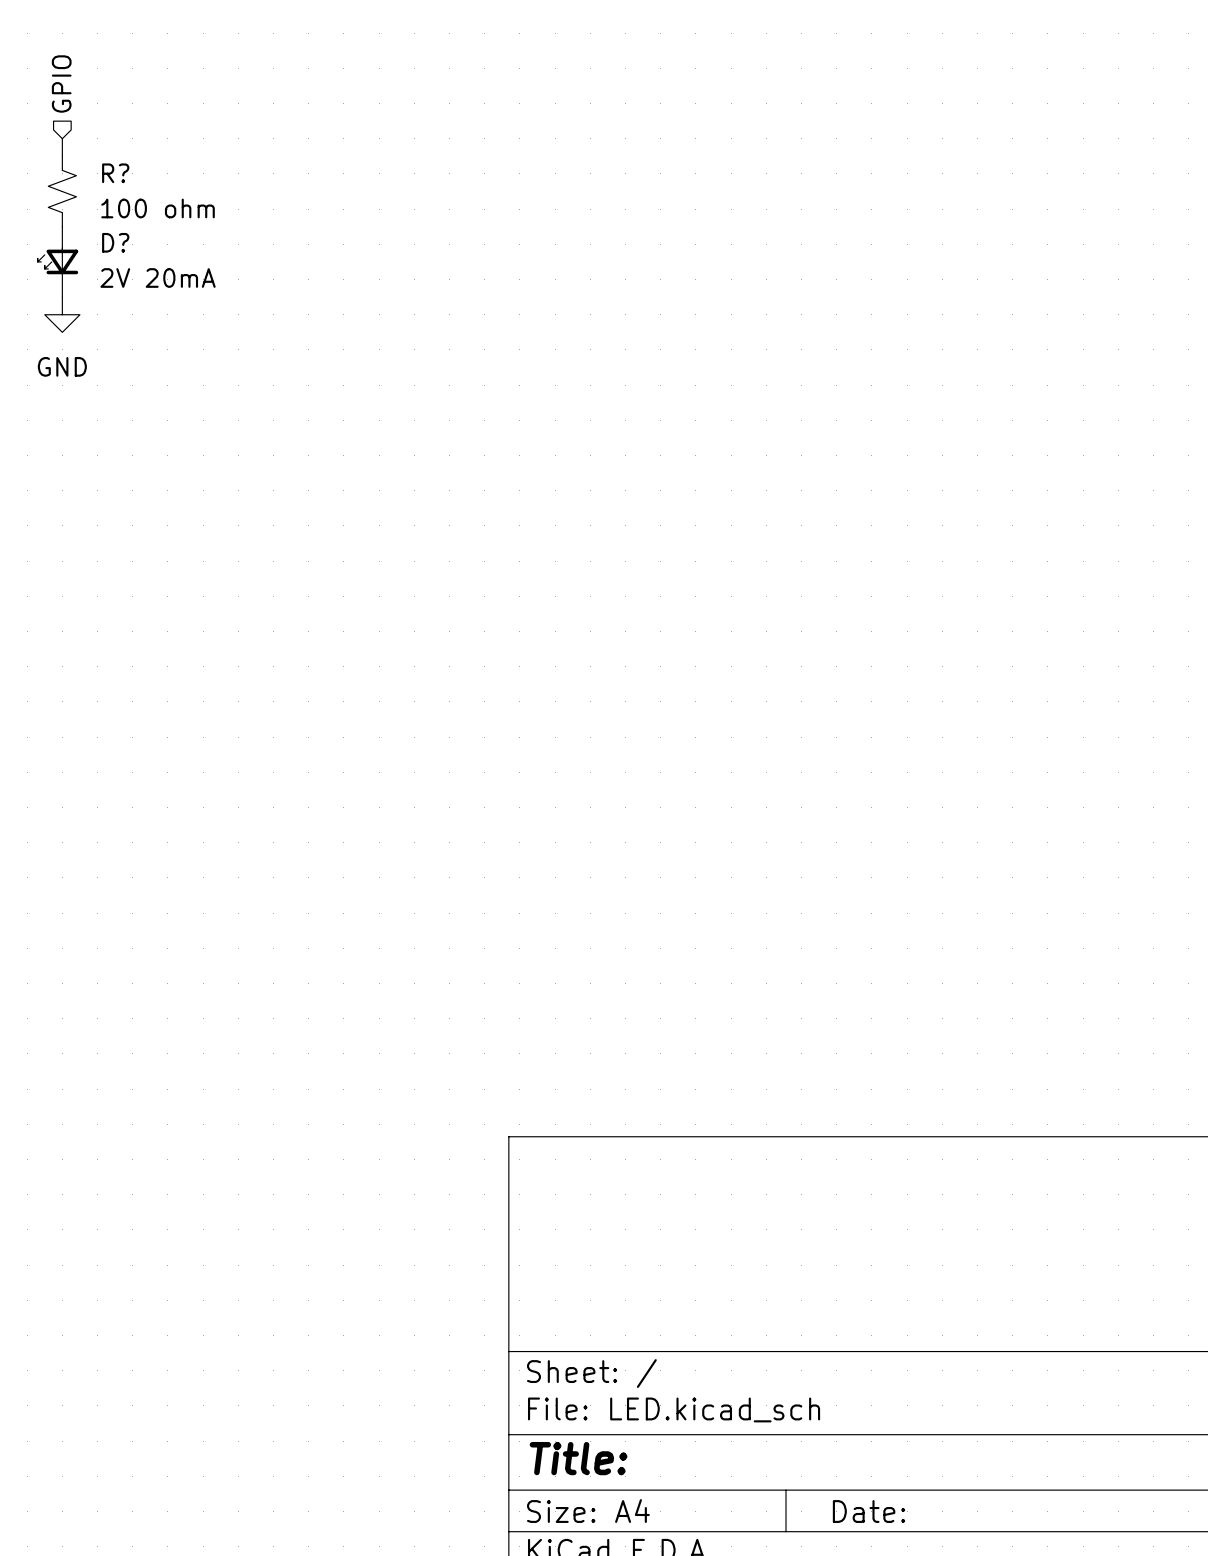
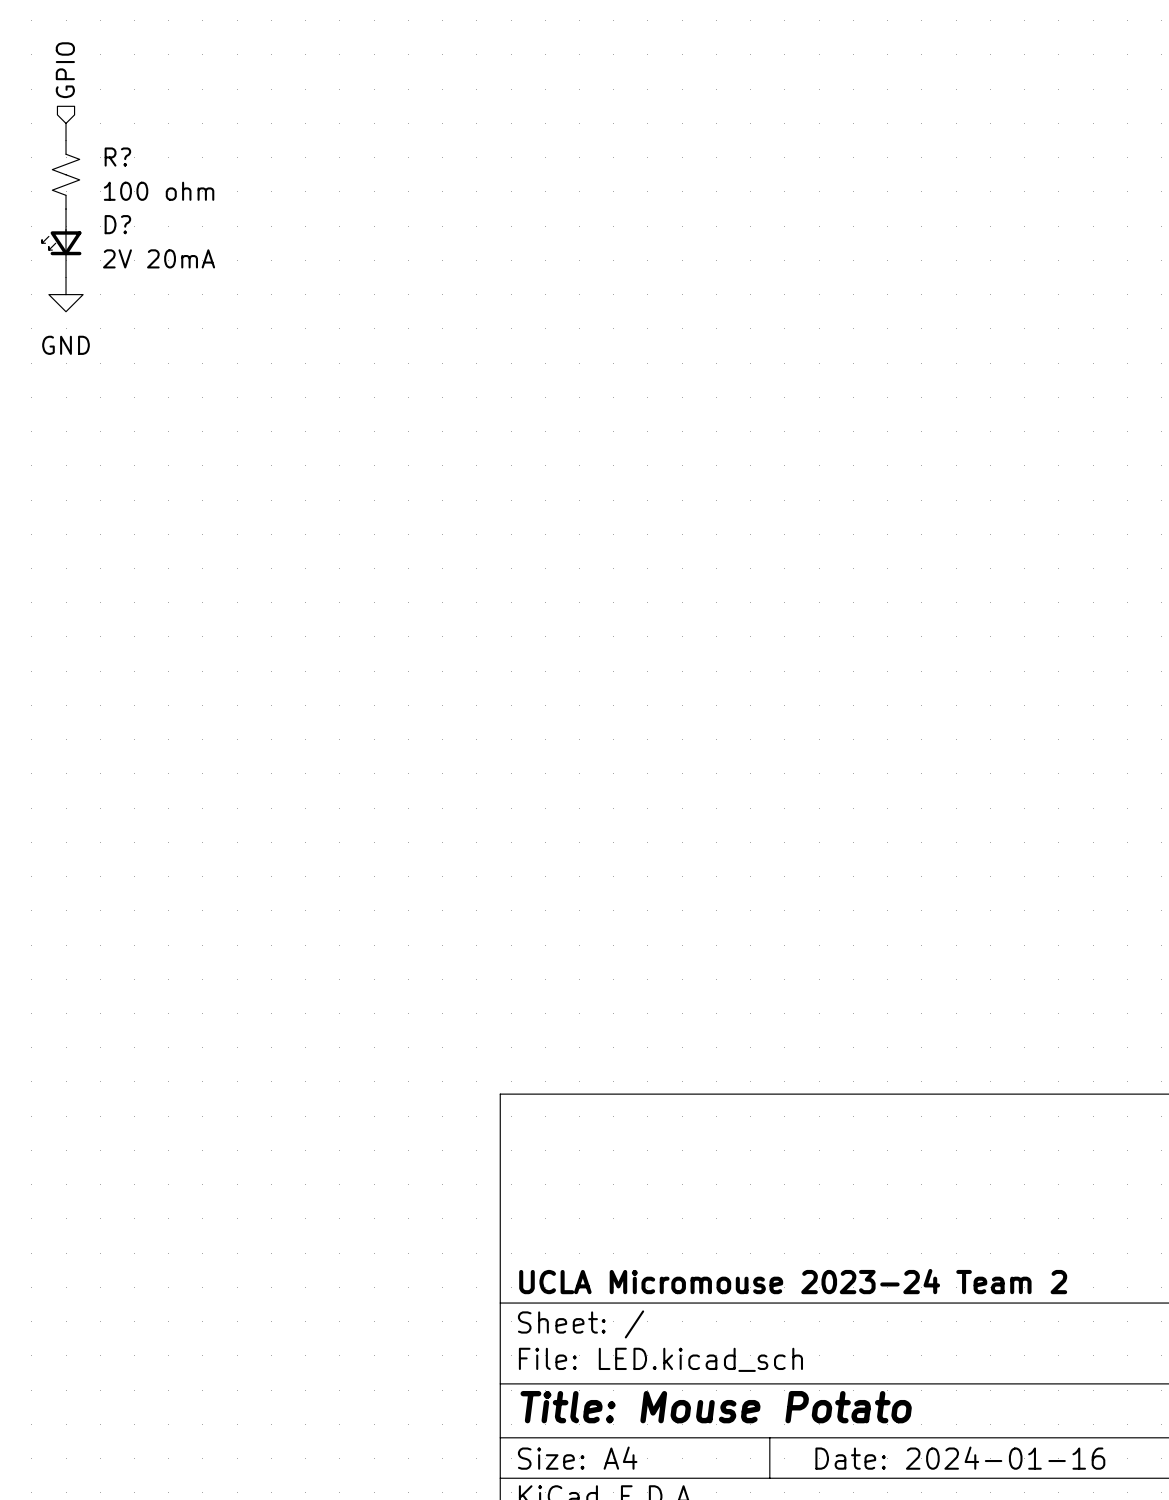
title block: none -> UCLA Micromouse 2023-24 Team 2 (793, 1281)
title block: Title: (578, 1458) -> Title: Mouse Potato (716, 1407)
title block: Date: (869, 1511) -> Date: 2024-01-16 (960, 1458)

